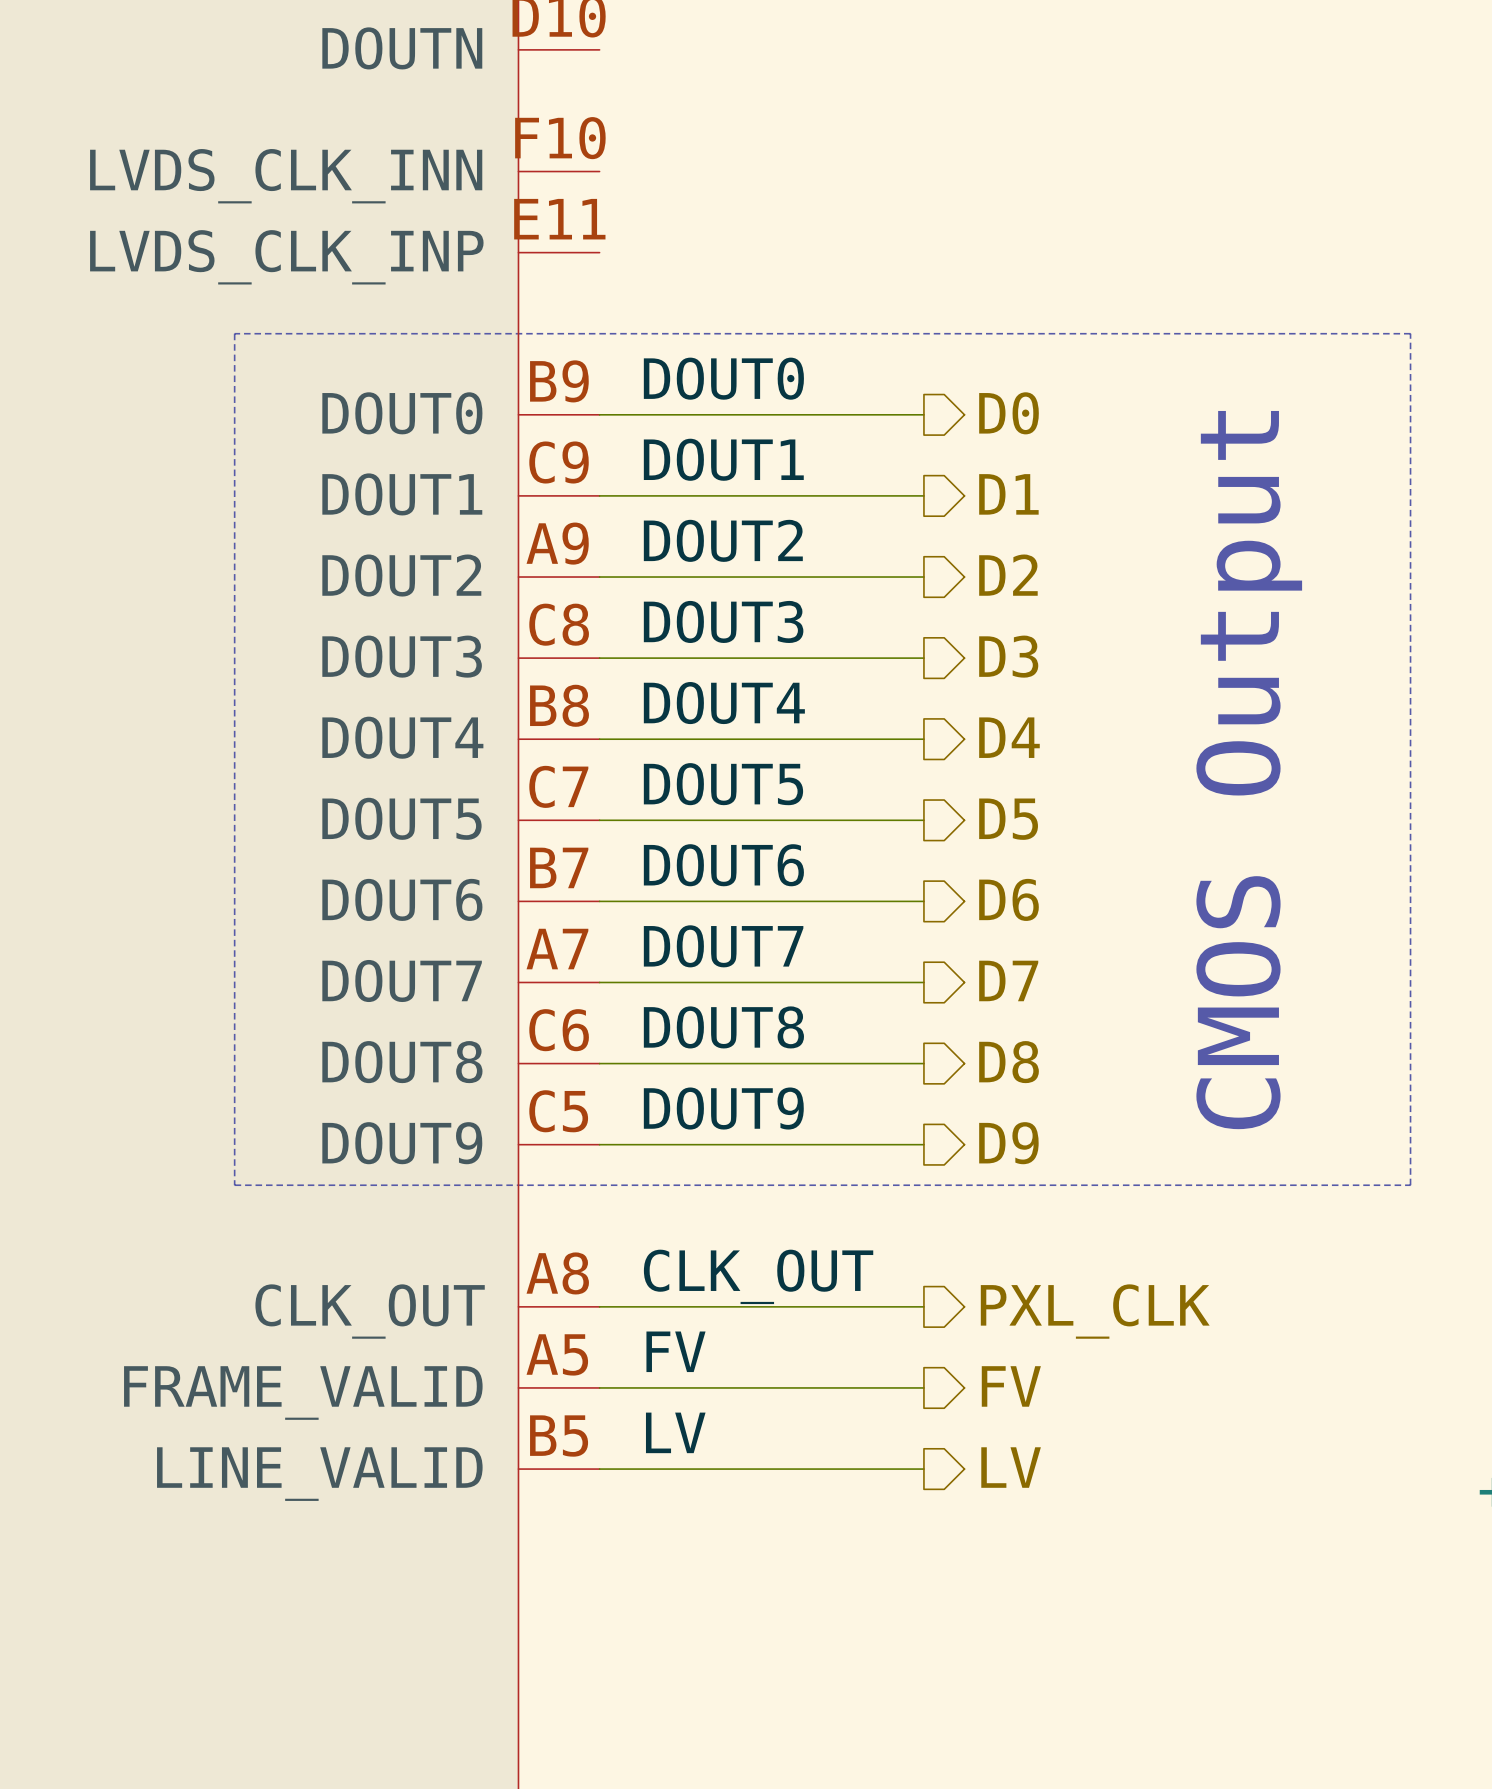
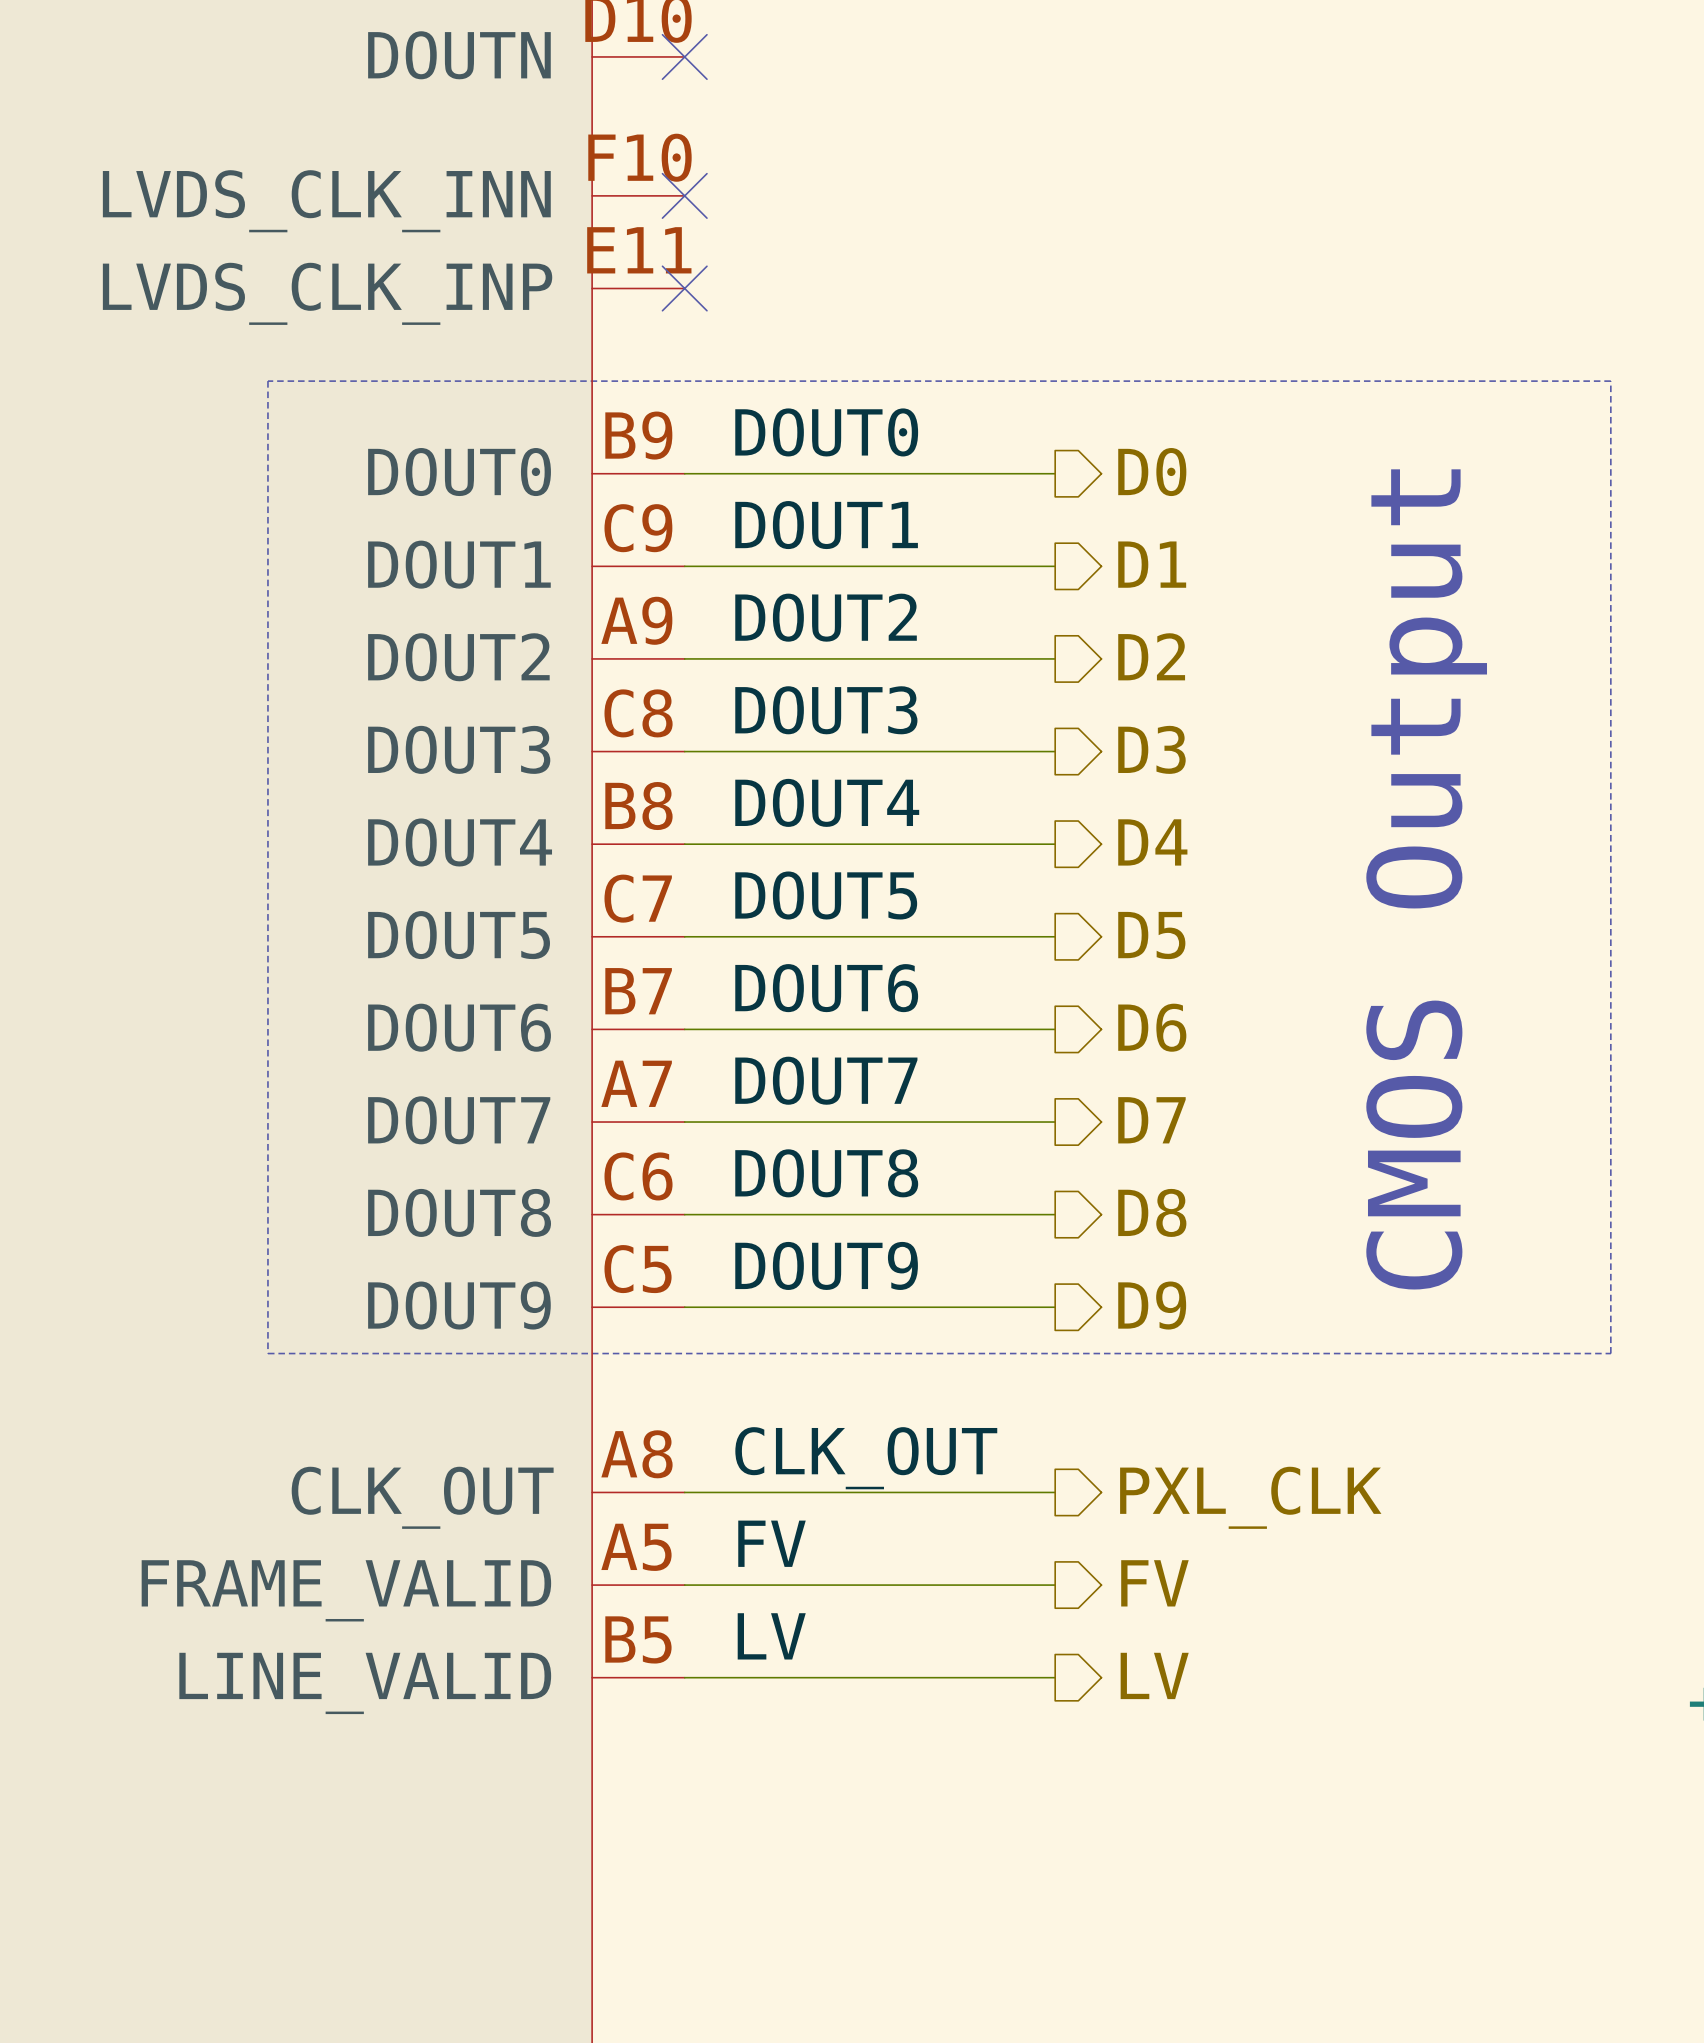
no-connect mark: none -> (684, 56)
no-connect mark: none -> (684, 195)
no-connect mark: none -> (684, 288)

